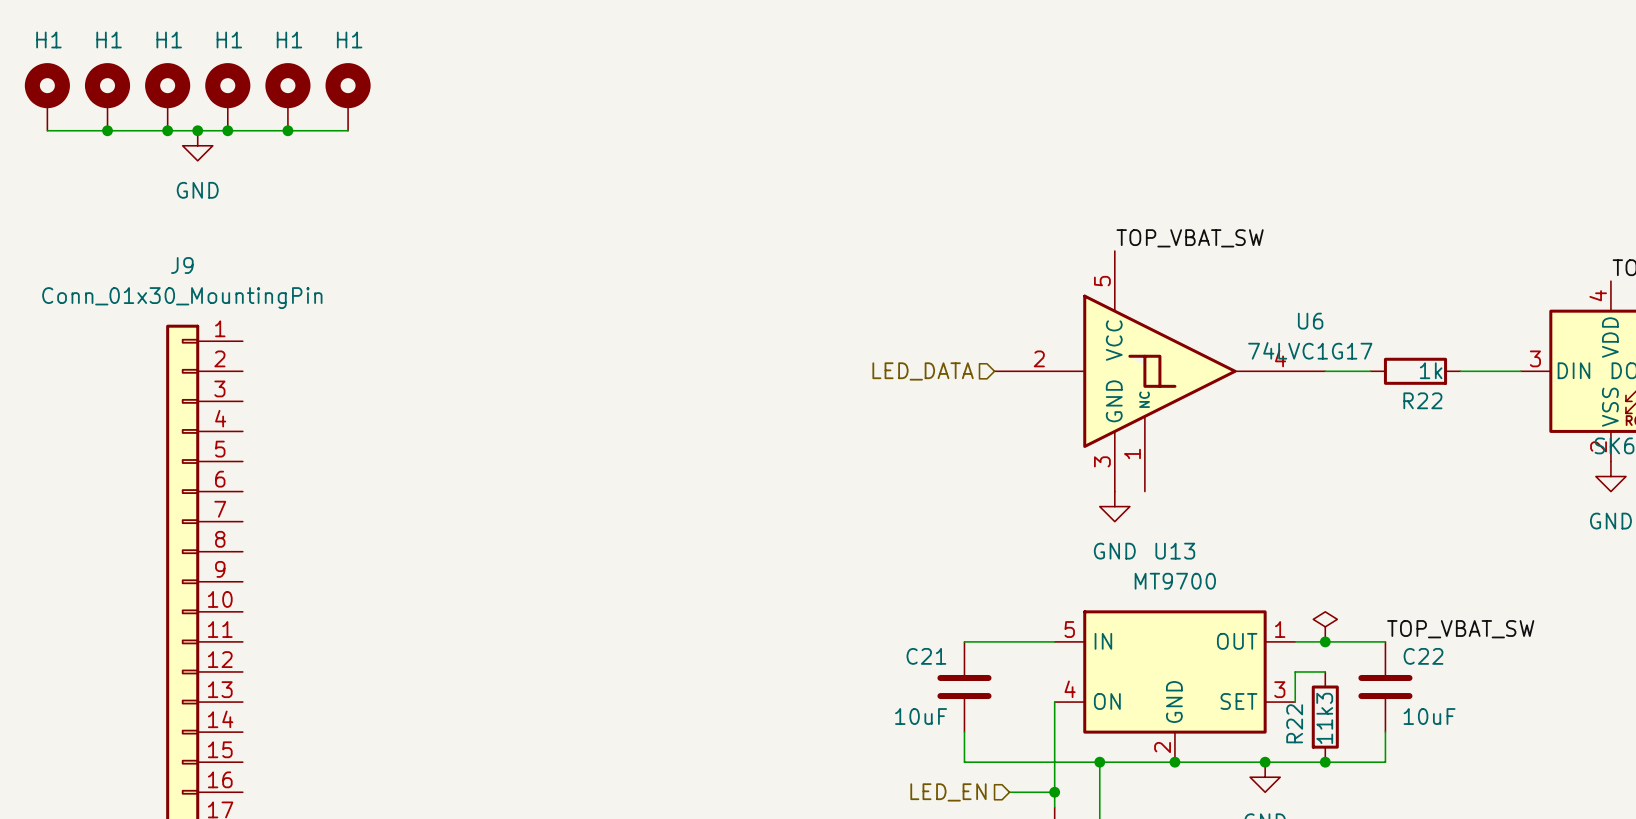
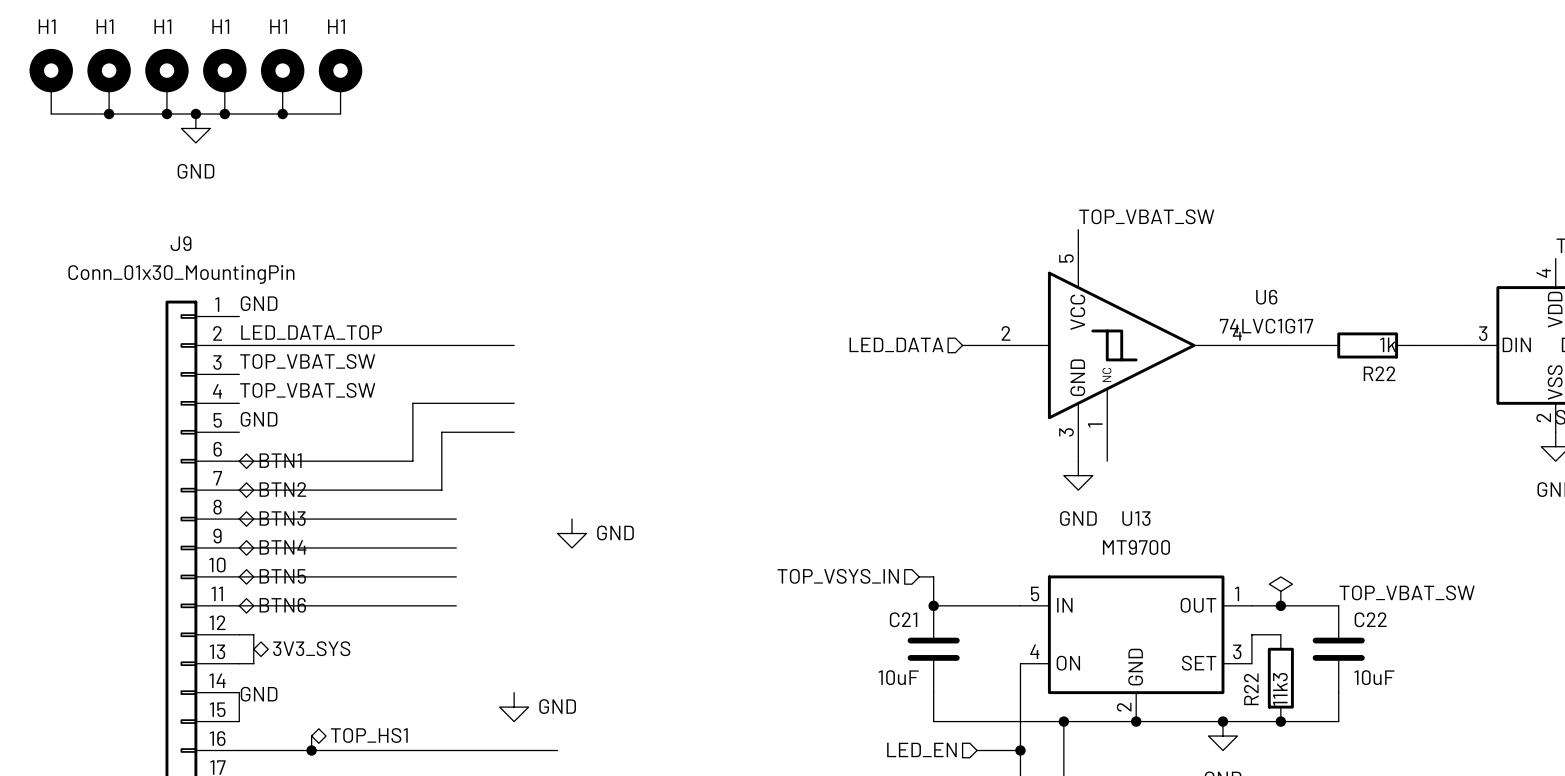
label: none -> GND (259, 303)
label: none -> LED_DATA_TOP (311, 332)
wire: none -> (239, 345) (514, 345)
label: none -> TOP_VBAT_SW (307, 361)
label: none -> TOP_VBAT_SW (307, 390)
wire: none -> (514, 403) (412, 403) (412, 461) (239, 461)
label: none -> GND (259, 419)
wire: none -> (514, 432) (441, 432) (441, 490) (239, 490)
hierarchical label: none -> BTN1 (280, 460)
hierarchical label: none -> BTN2 (282, 489)
wire: none -> (239, 519) (456, 519)
hierarchical label: none -> BTN3 (282, 518)
power symbol: none -> GND (572, 533)
hierarchical label: none -> BTN4 (283, 547)
wire: none -> (239, 547) (456, 547)
wire: none -> (239, 576) (456, 576)
hierarchical label: none -> BTN5 (282, 576)
wire: none -> (919, 576) (933, 576) (933, 605)
hierarchical label: none -> TOP_VSYS_IN (838, 576)
wire: none -> (239, 605) (456, 605)
hierarchical label: none -> BTN6 (282, 605)
junction: none -> (933, 605)
wire: none -> (239, 634) (253, 634) (253, 663) (239, 663)
hierarchical label: none -> 3V3_SYS (311, 648)
wire: none -> (239, 692) (239, 721)
label: none -> GND (259, 694)
power symbol: none -> GND (514, 707)
wire: none -> (311, 736) (311, 750)
hierarchical label: none -> TOP_HS1 (369, 735)
wire: none -> (239, 750) (557, 750)
junction: none -> (311, 750)

